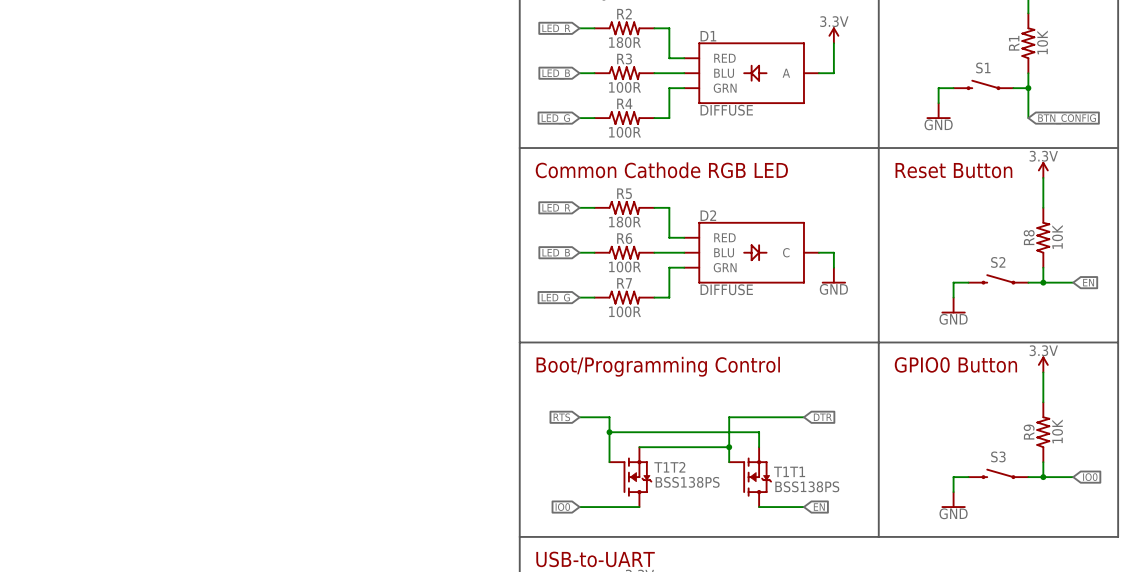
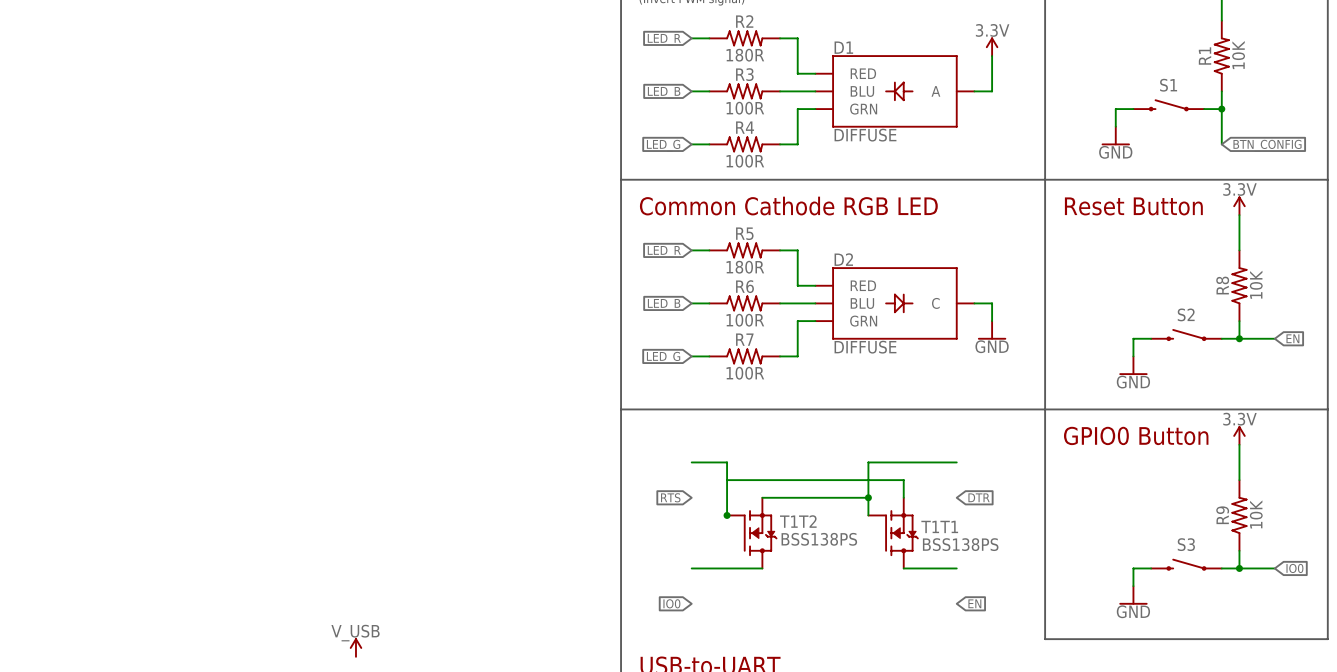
text: Boot/Programming Control (658, 366) -> none
wire: none -> (956, 462) (868, 462) (868, 497) (762, 497)
wire: none -> (727, 480) (903, 480) (903, 497)
wire: (579, 417) (609, 417) -> (691, 462) (727, 462) (727, 497)
wire: (729, 417) (803, 417) -> none
wire: (729, 432) (729, 462) -> none
wire: (639, 447) (729, 447) -> none
junction position: (729, 447) -> (868, 497)
wire: (759, 447) (759, 432) (609, 432) (609, 462) -> none
T1T2 position: (630, 477) -> (752, 533)
T1T1 position: (750, 477) -> (893, 533)
wire: (579, 507) (639, 507) -> (691, 568) (762, 568)
wire: (759, 507) (803, 507) -> (903, 568) (956, 568)
line: (519, 536) (878, 536) -> none
power symbol: none -> V_USB (355, 647)

